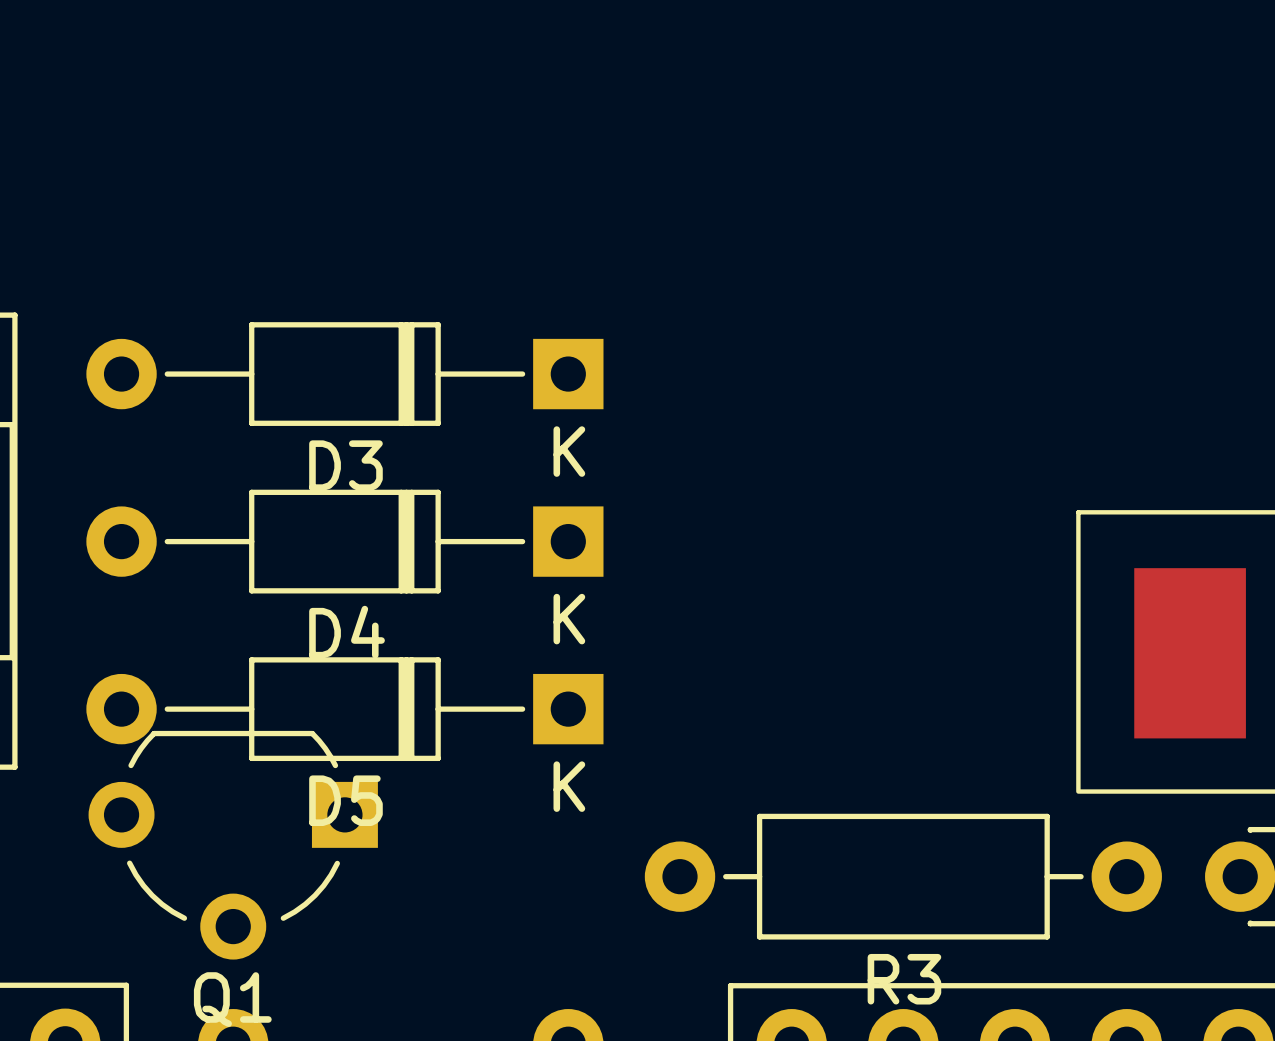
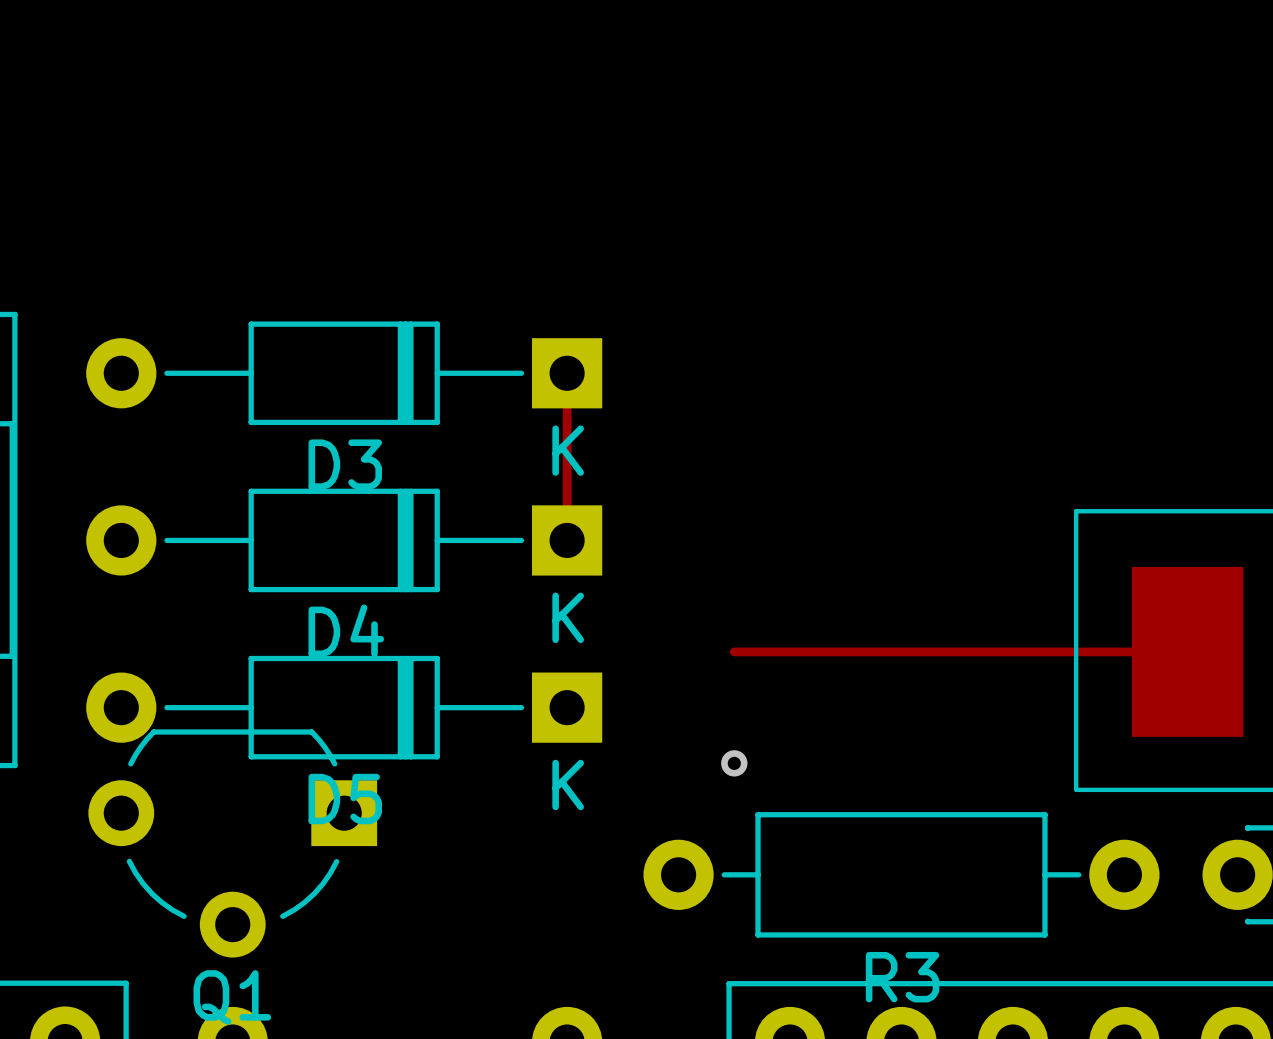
track: none -> (567, 373) (567, 540)
track: none -> (734, 651) (1187, 651)
via: none -> (734, 763)

